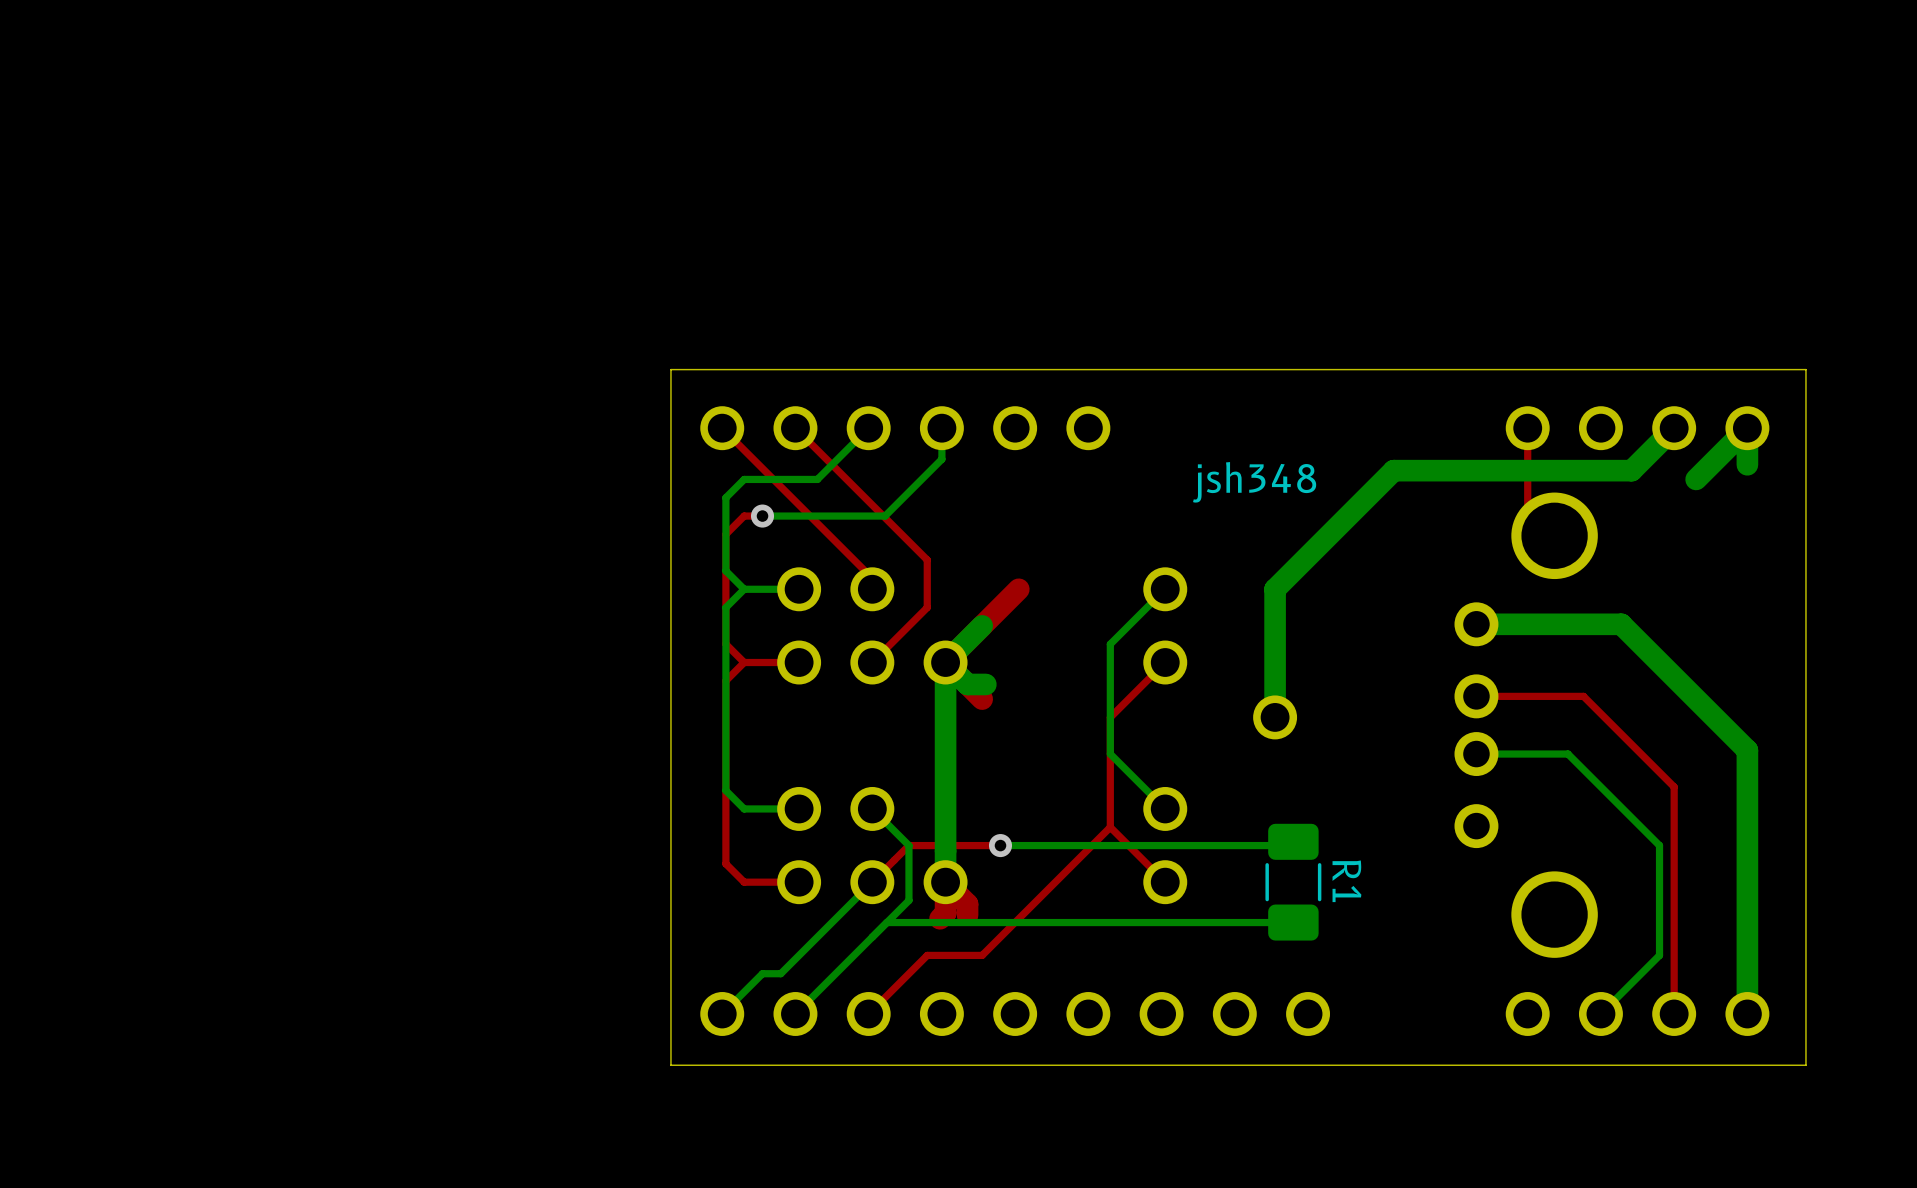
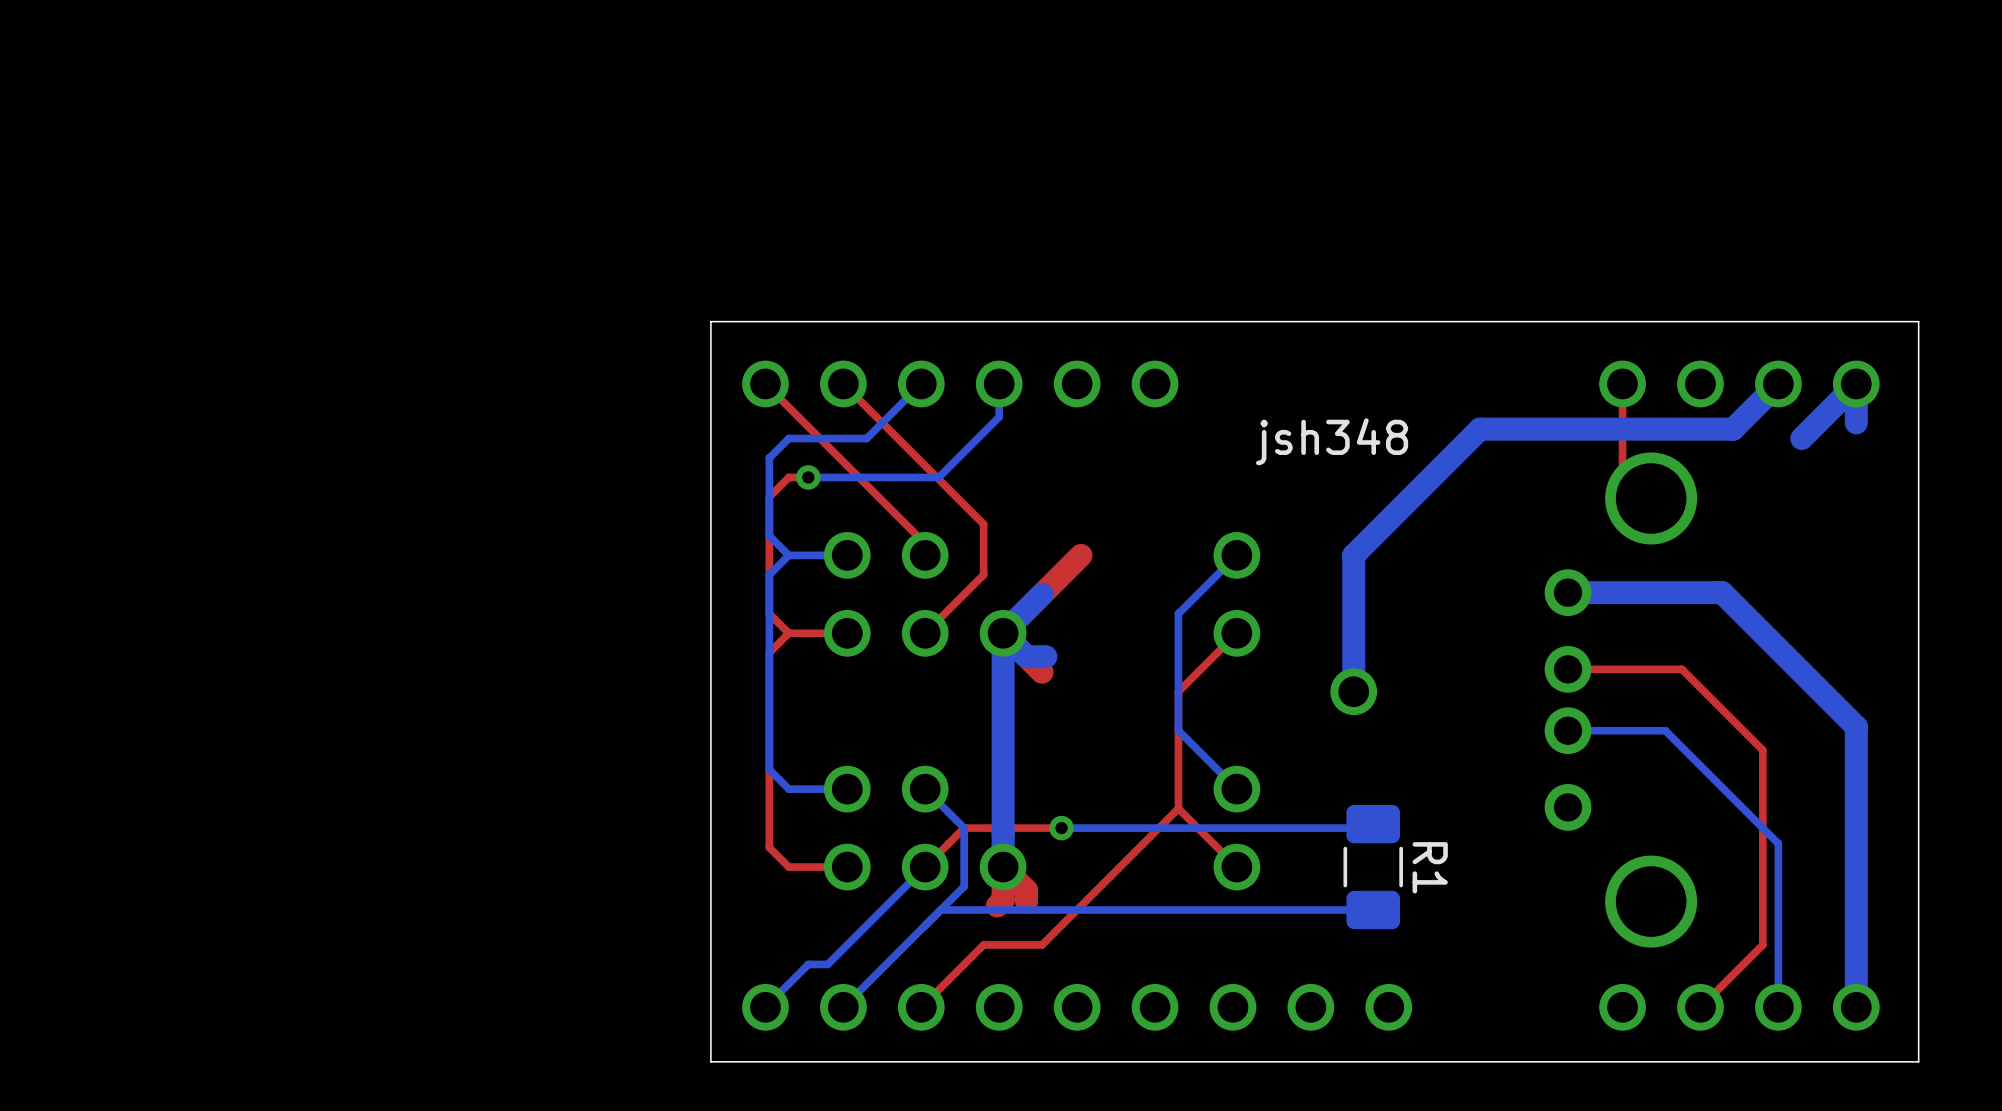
top track: (1659, 772) (1674, 786) (1674, 1013) -> (1762, 750) (1762, 944) (1700, 1007)
bottom track: (1659, 845) (1659, 955) (1600, 1013) -> (1762, 828) (1778, 843) (1778, 1007)

